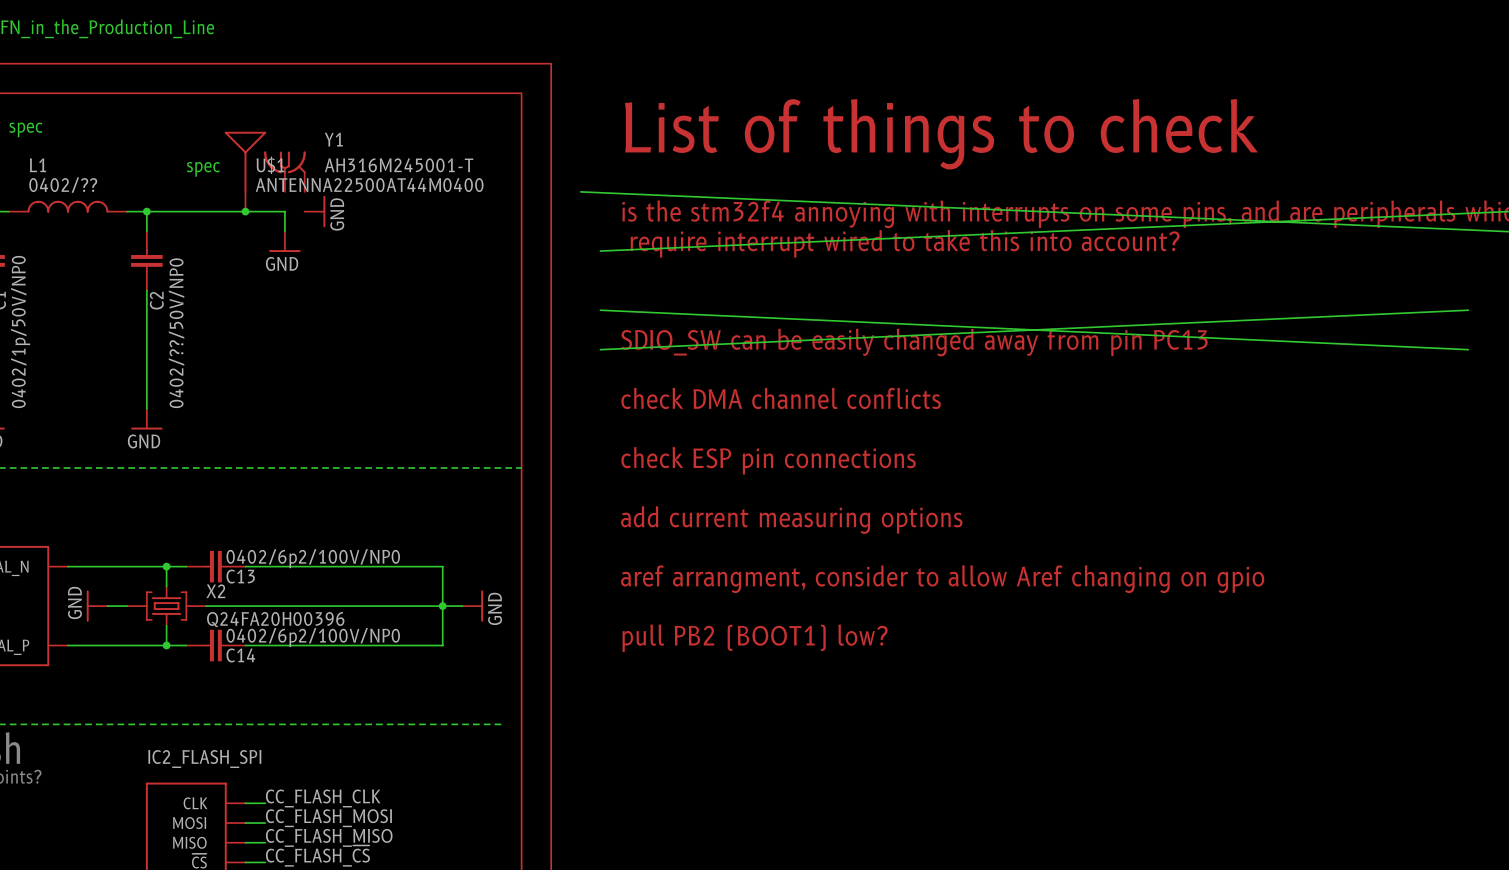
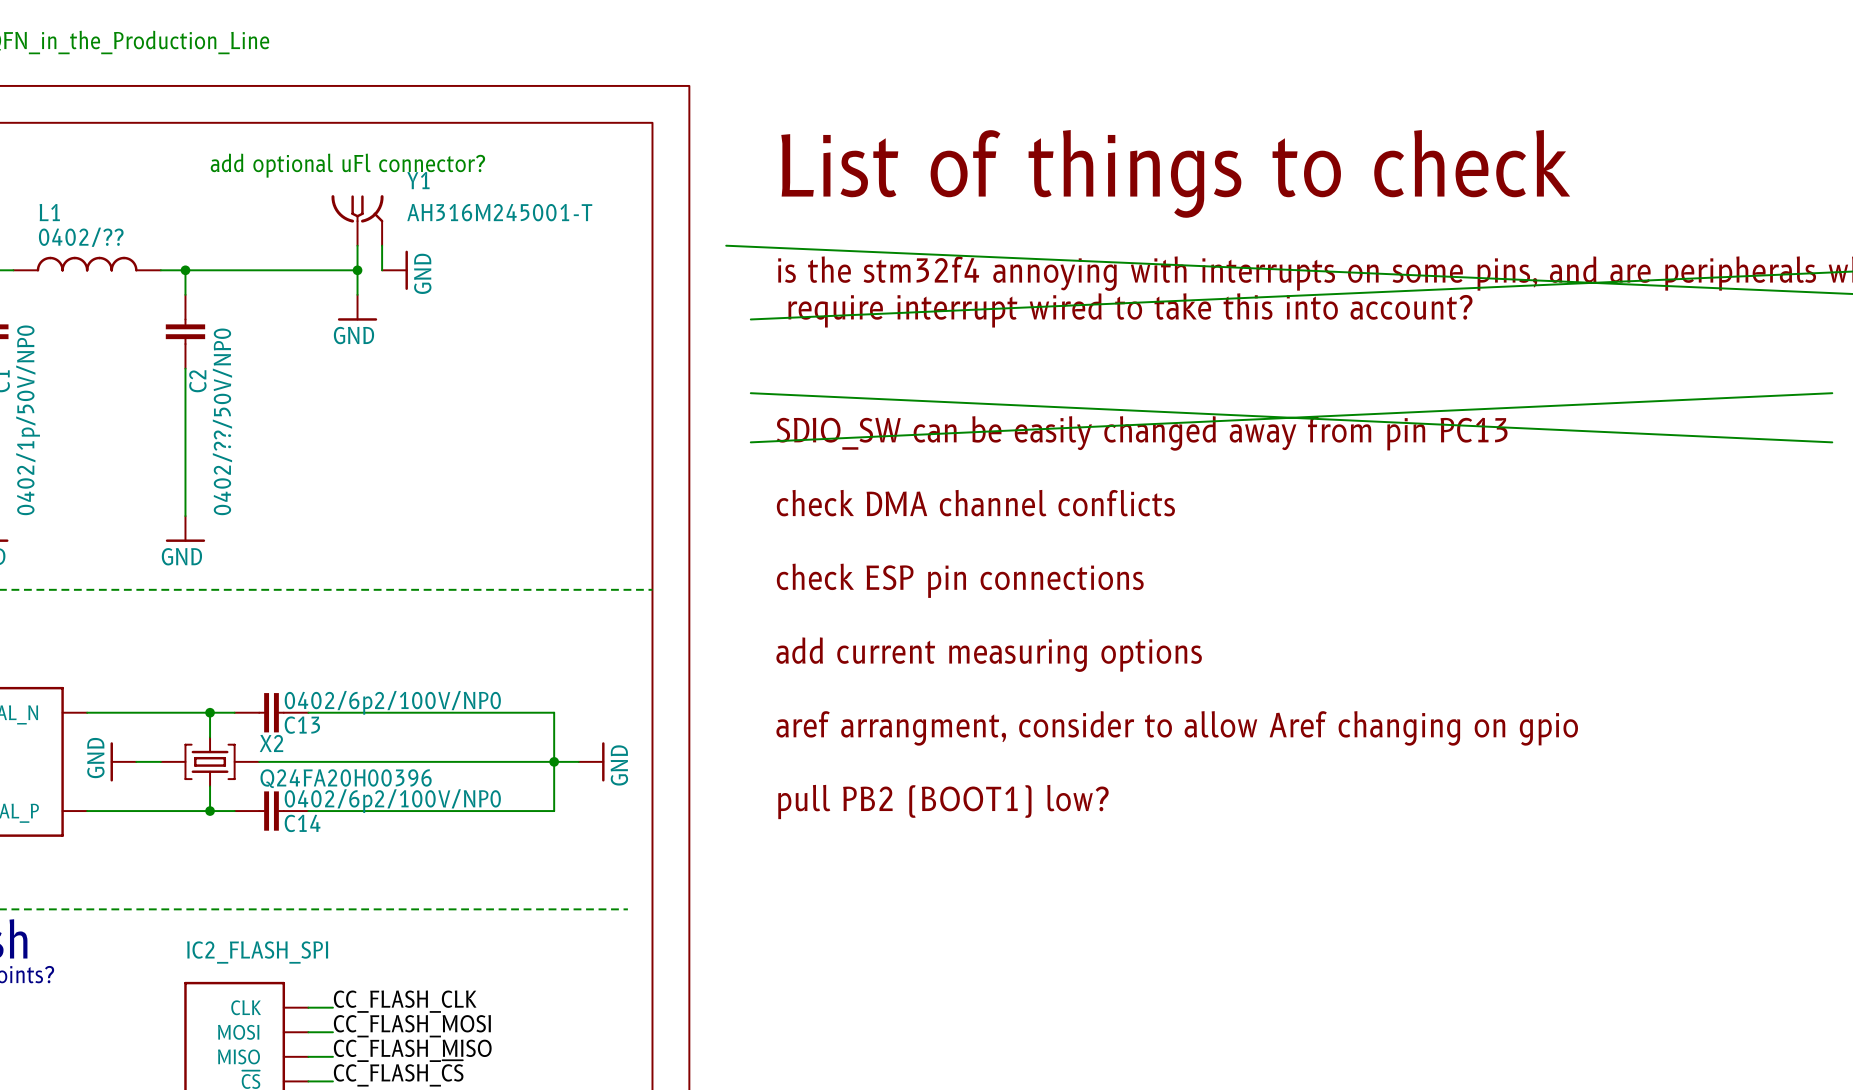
text: none -> add optional uFl connector? (347, 165)
text: spec (25, 129) -> none
text: spec (203, 169) -> none
U$1: ANTENNA22500AT44M0400 (245, 171) -> none
wire: none -> (357, 245) (357, 270)
wire: none -> (382, 245) (382, 270)
junction position: (245, 211) -> (357, 270)

